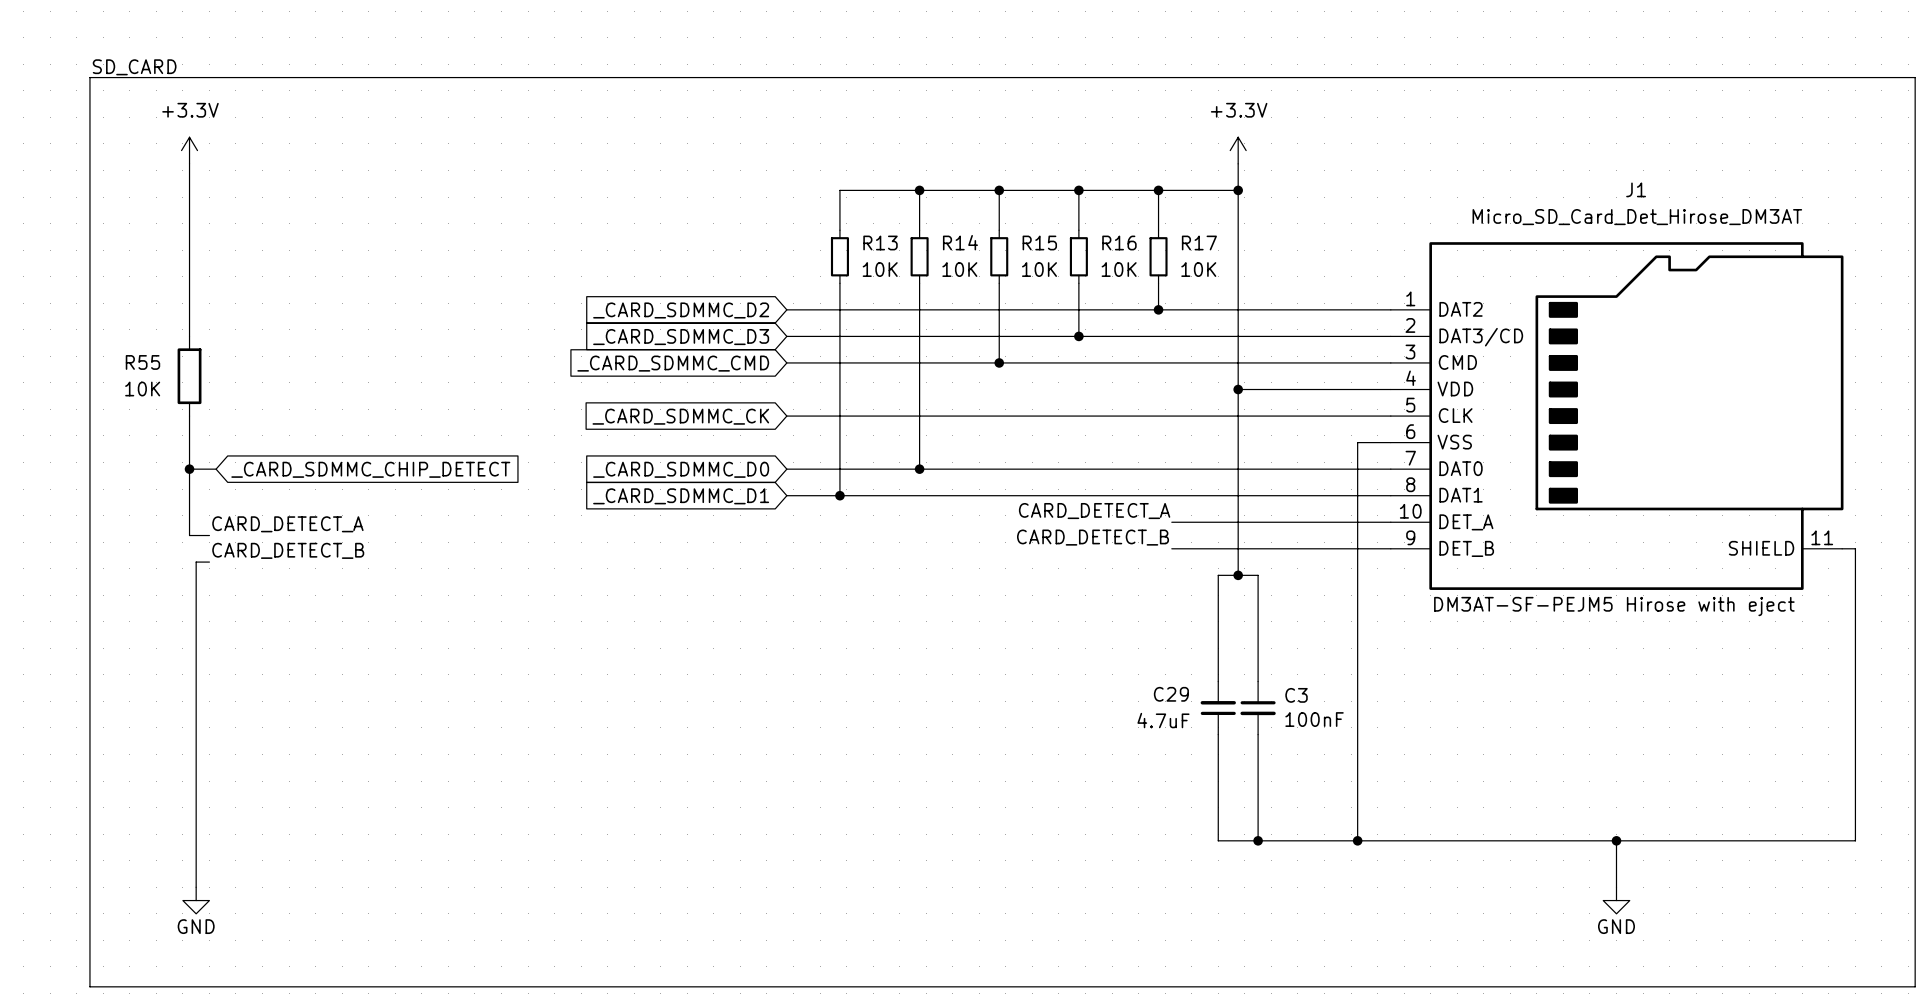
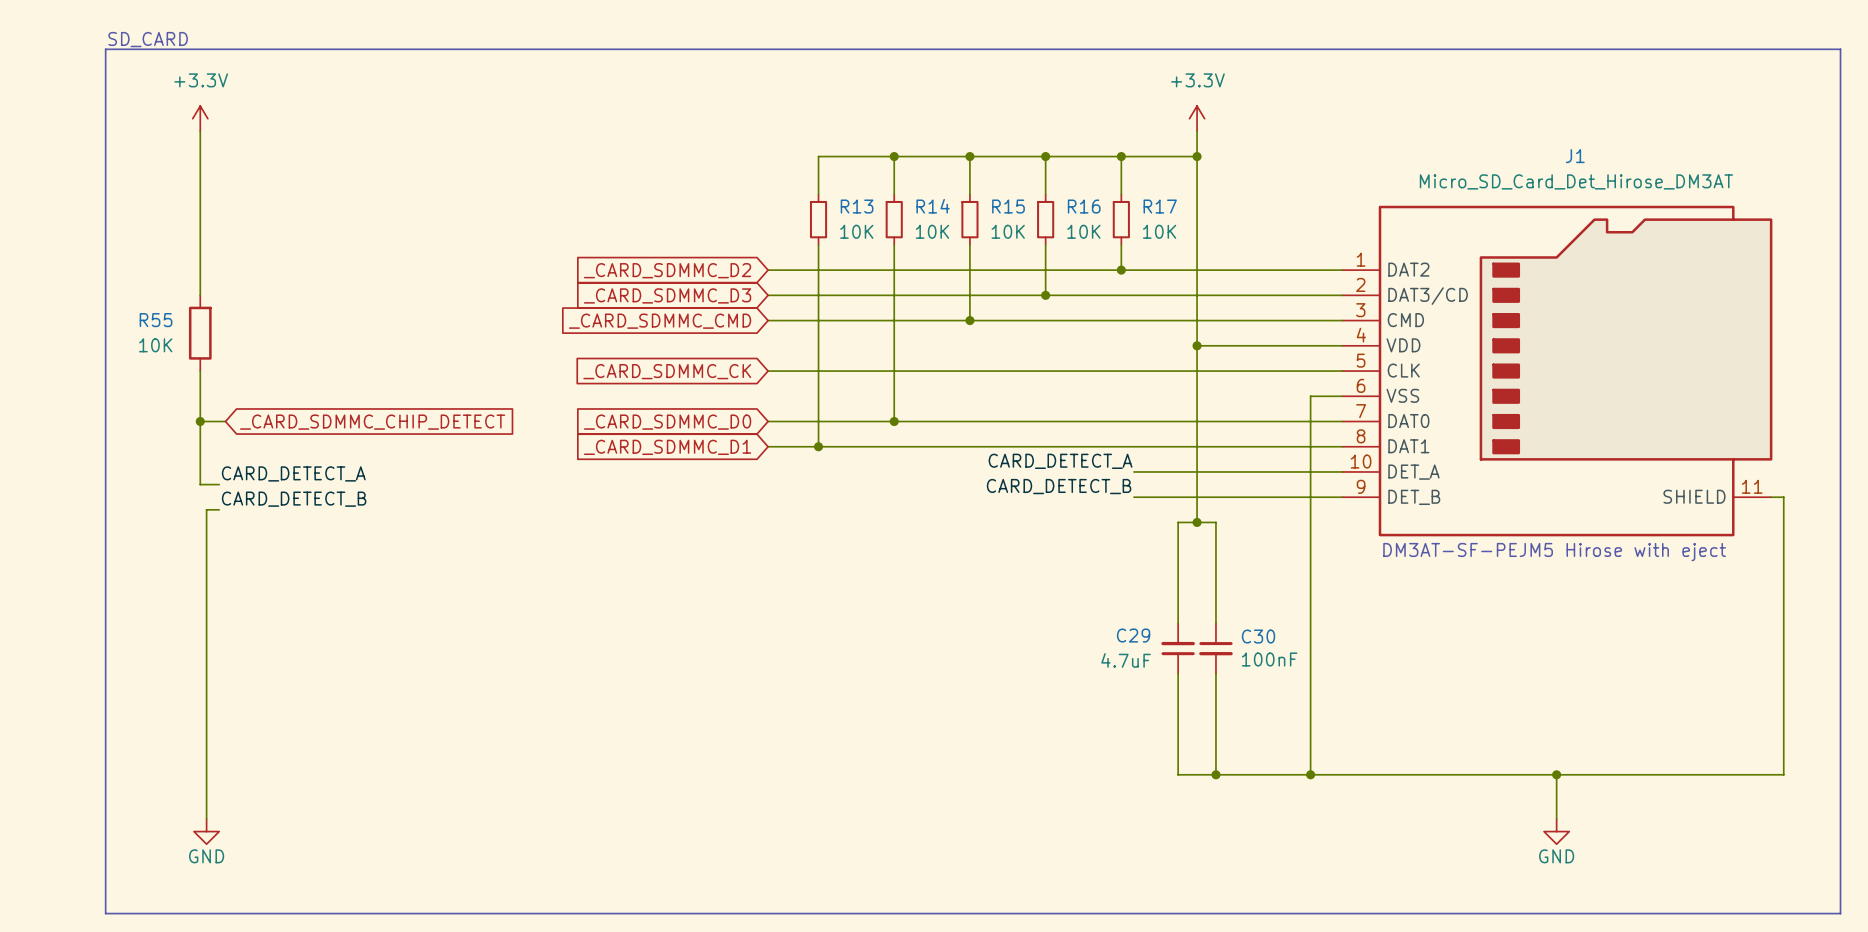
C3 name: C3 (1296, 695) -> C30 (1258, 636)

